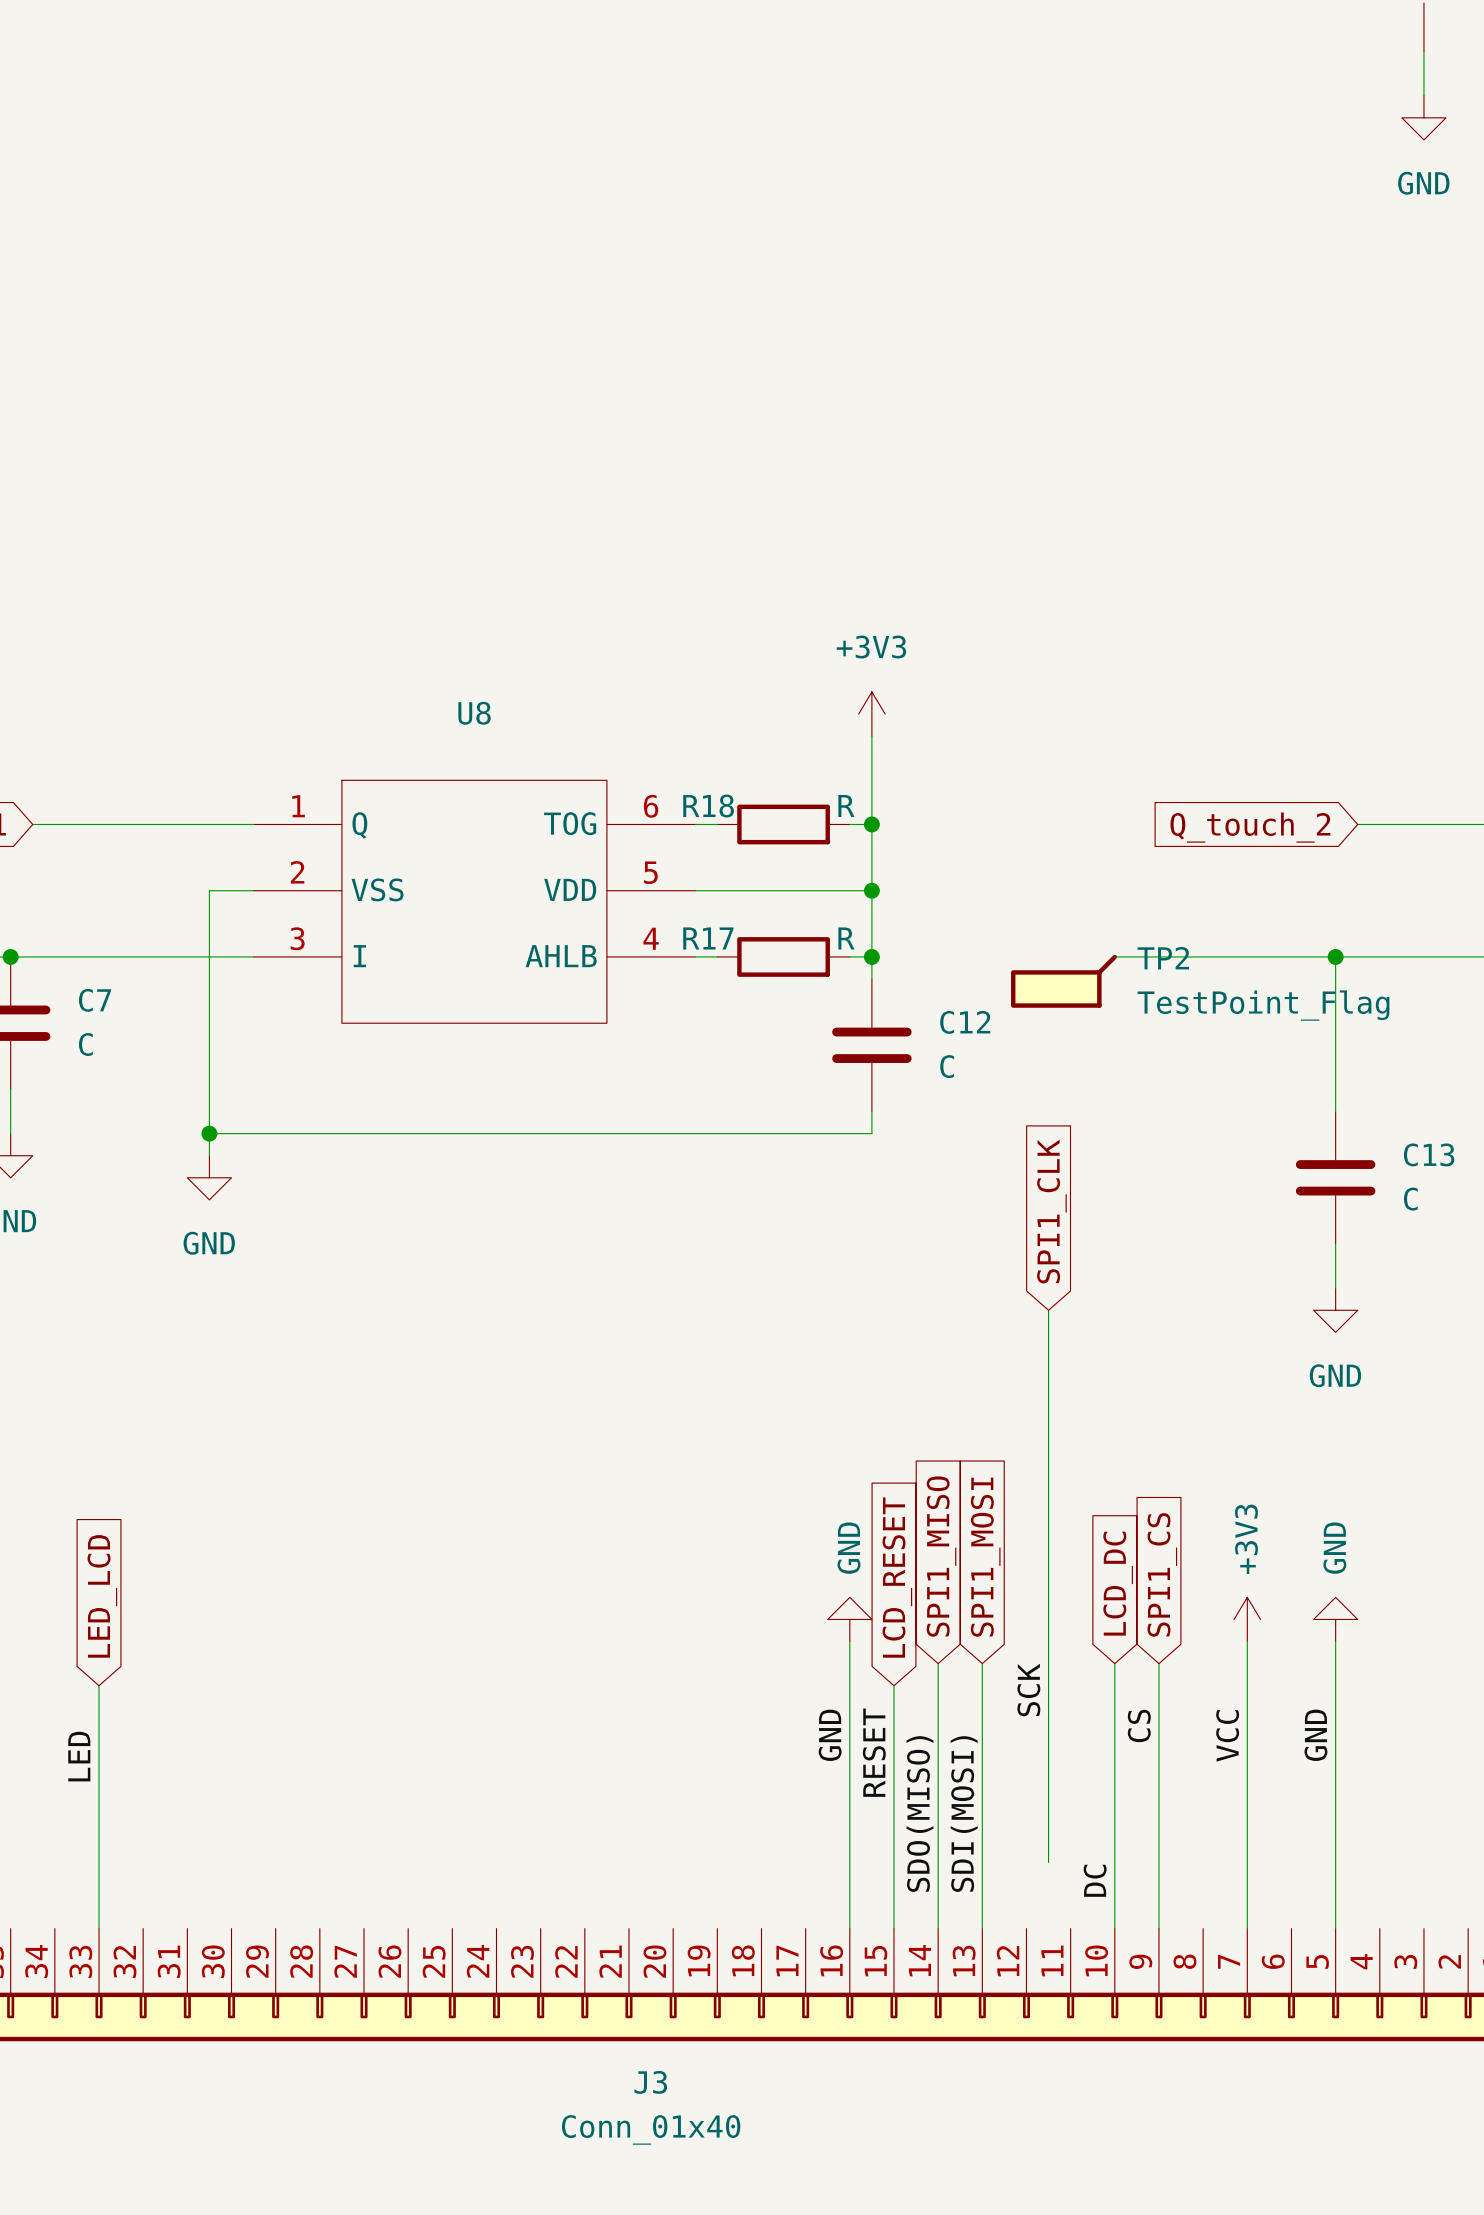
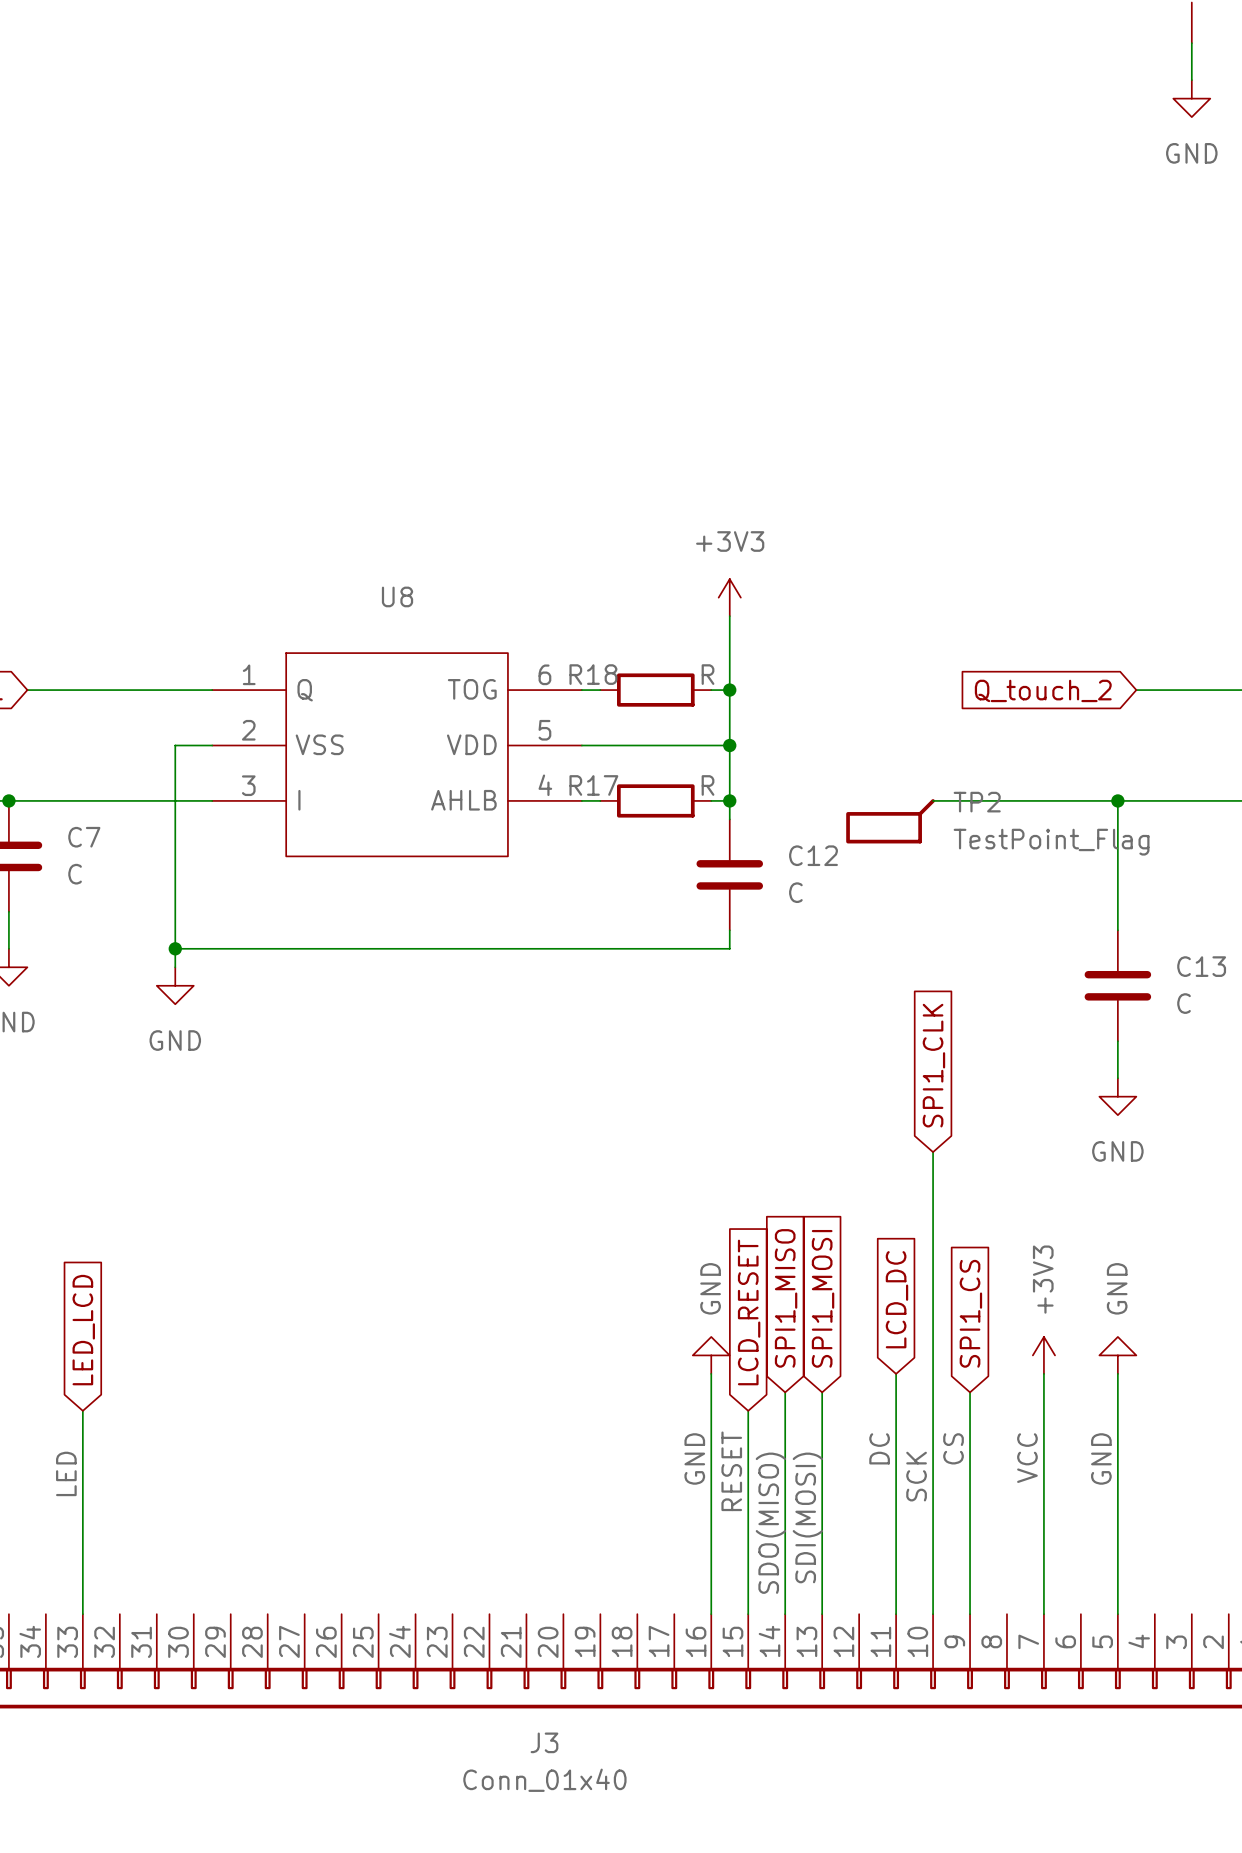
global label position: SPI1_CLK (1051, 1211) -> SPI1_CLK (933, 1065)
wire: (1048, 1310) (1048, 1862) -> none
wire: none -> (933, 1152) (933, 1392)
global label position: LCD_DC (1118, 1583) -> LCD_DC (896, 1299)
wire: none -> (896, 1373) (896, 1614)
label position: SCK (1028, 1690) -> SCK (916, 1476)
label position: DC (1095, 1880) -> DC (879, 1448)

